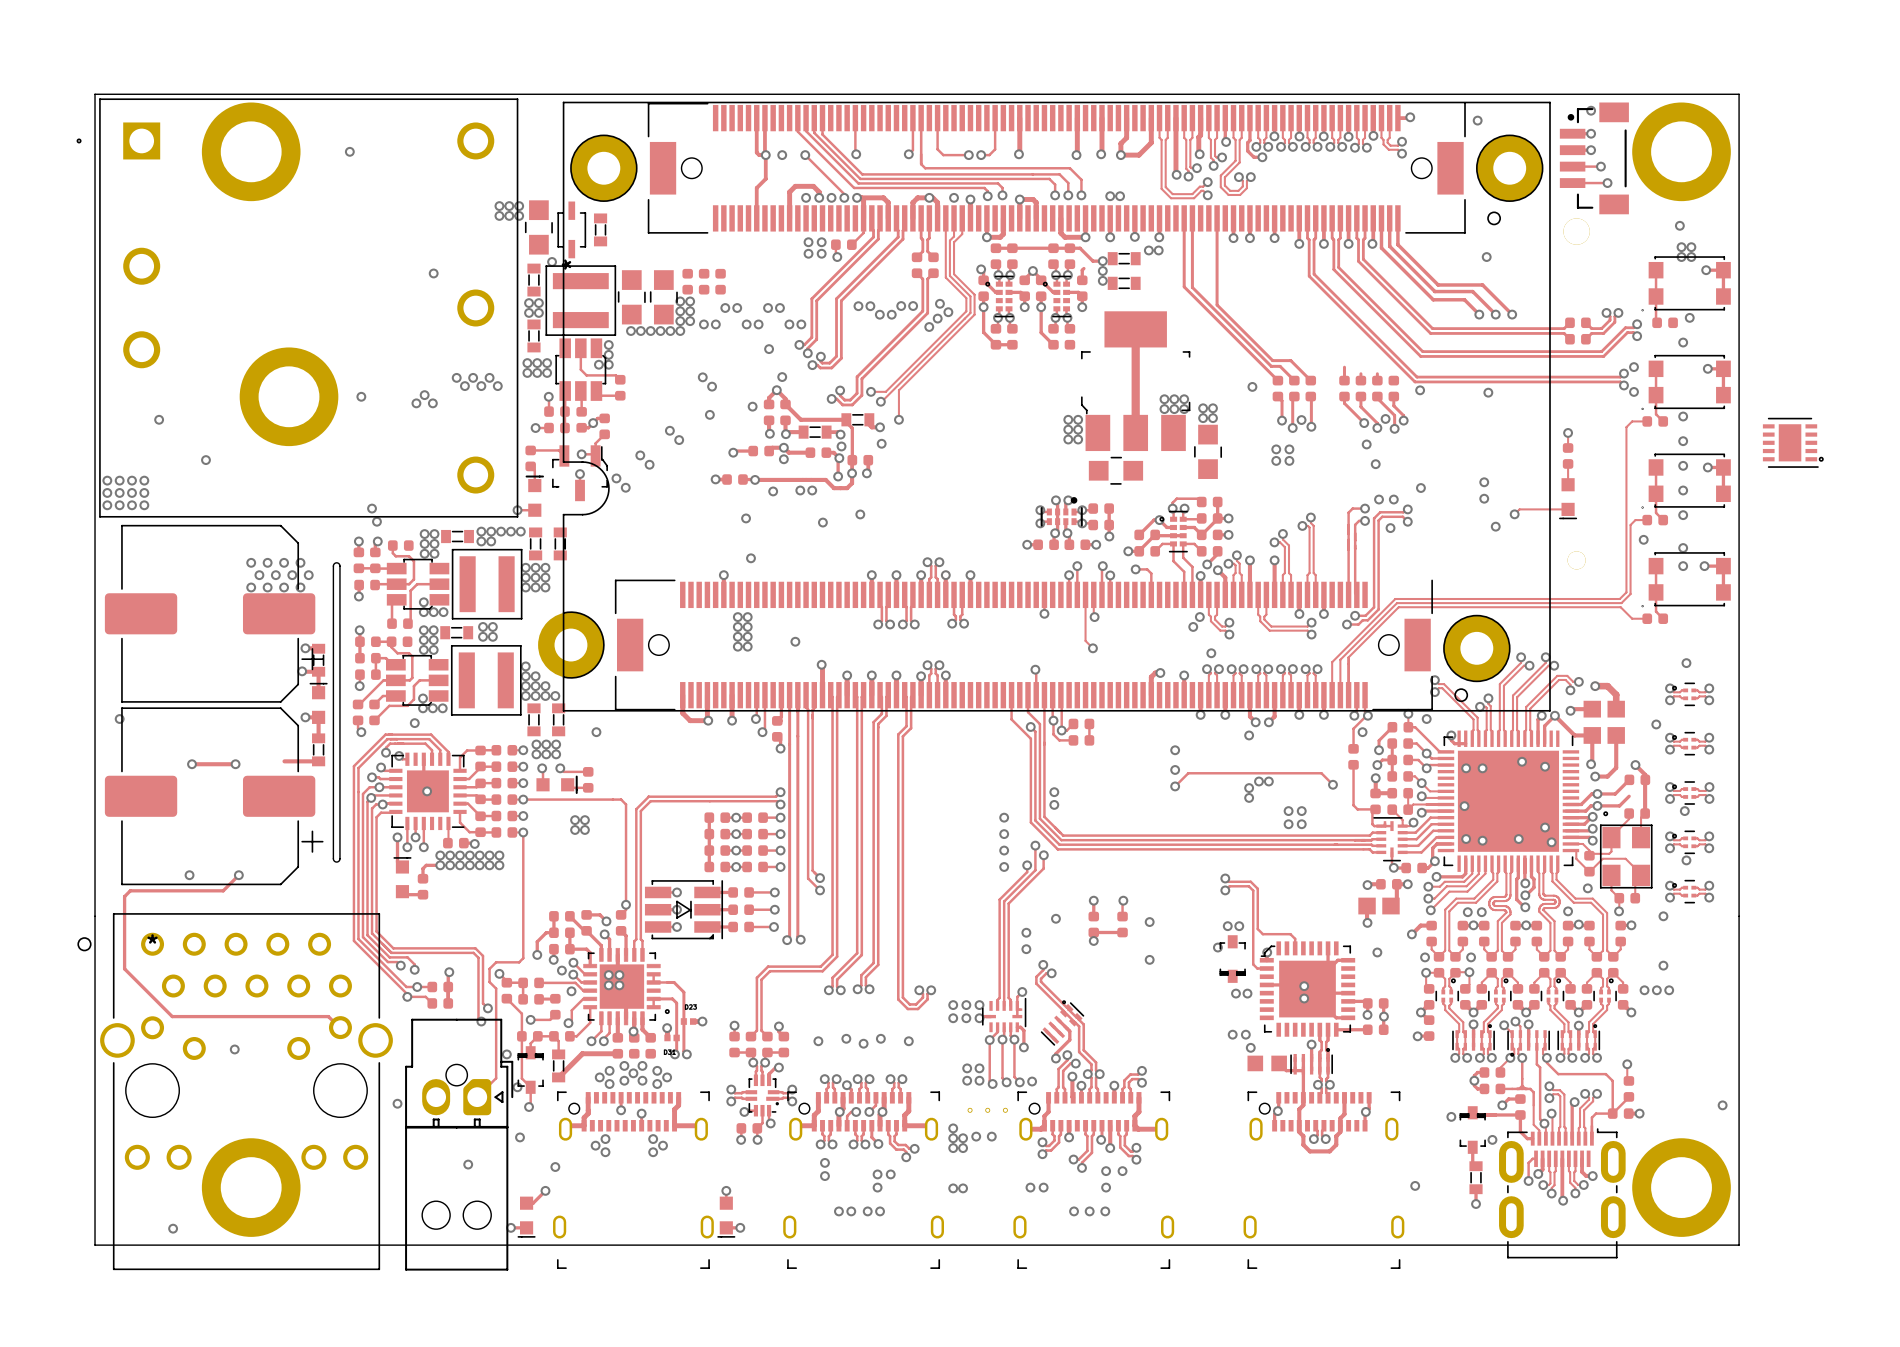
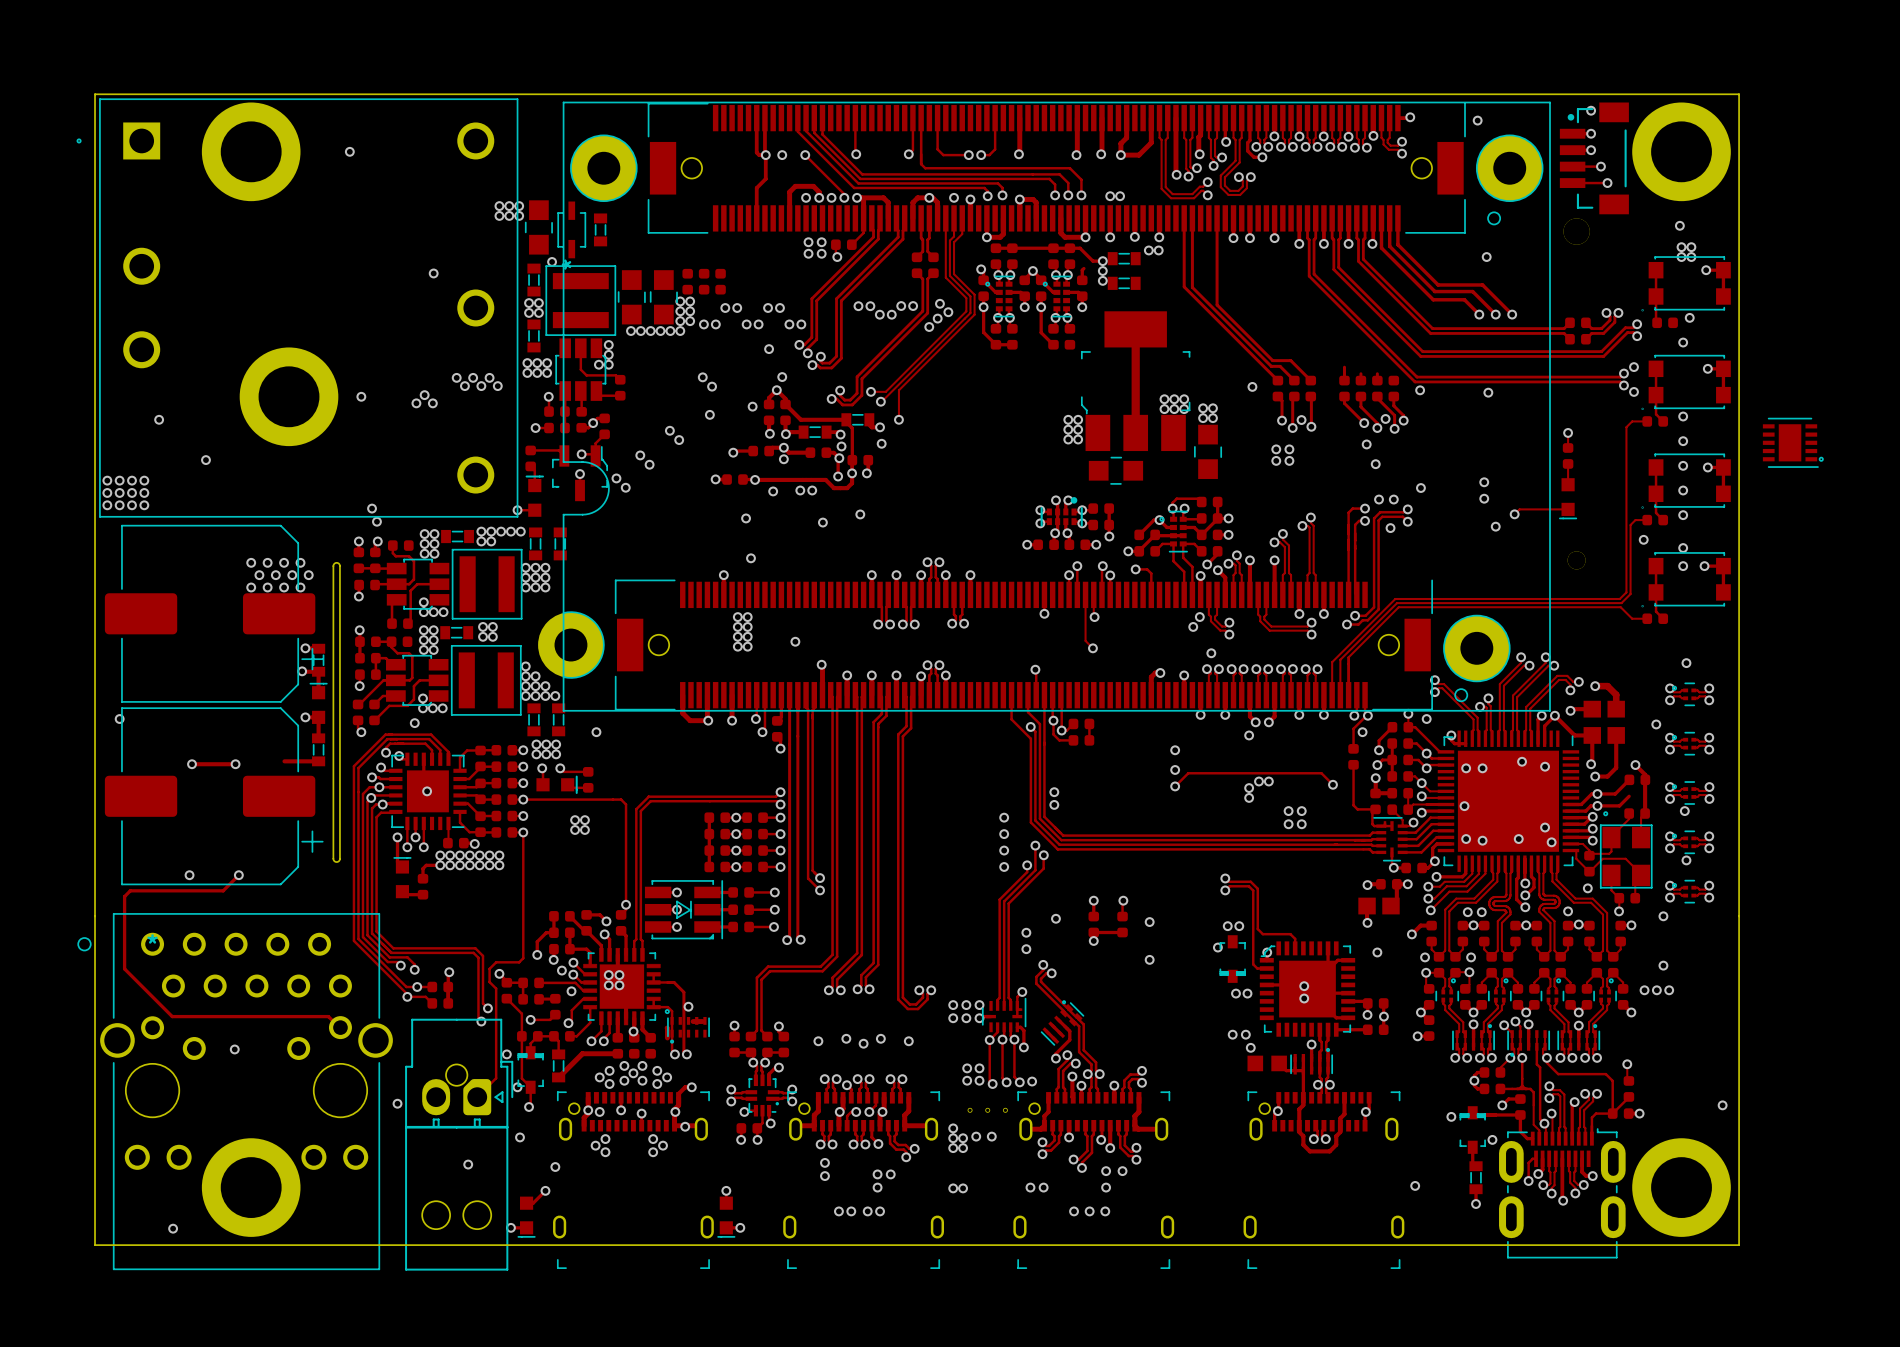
track: (653, 998) (672, 998) (676, 1003) (676, 1052) (674, 1054) -> none
via: none -> (688, 1006)
track: none -> (653, 1007) (667, 1007) (672, 1011) (672, 1050) (673, 1051)
part: (688, 1021) -> none
via: (702, 1021) -> none
via: (667, 1028) -> none
part: none -> (688, 1030)
part: (672, 1037) -> none
track: none -> (691, 1087) (685, 1087) (678, 1093) (678, 1097)
via: none -> (691, 1087)
via: none -> (588, 1110)
via: none -> (599, 1111)
via: none -> (675, 1111)
track: (584, 1125) (568, 1125) (565, 1129) -> none
via: none -> (685, 1126)

